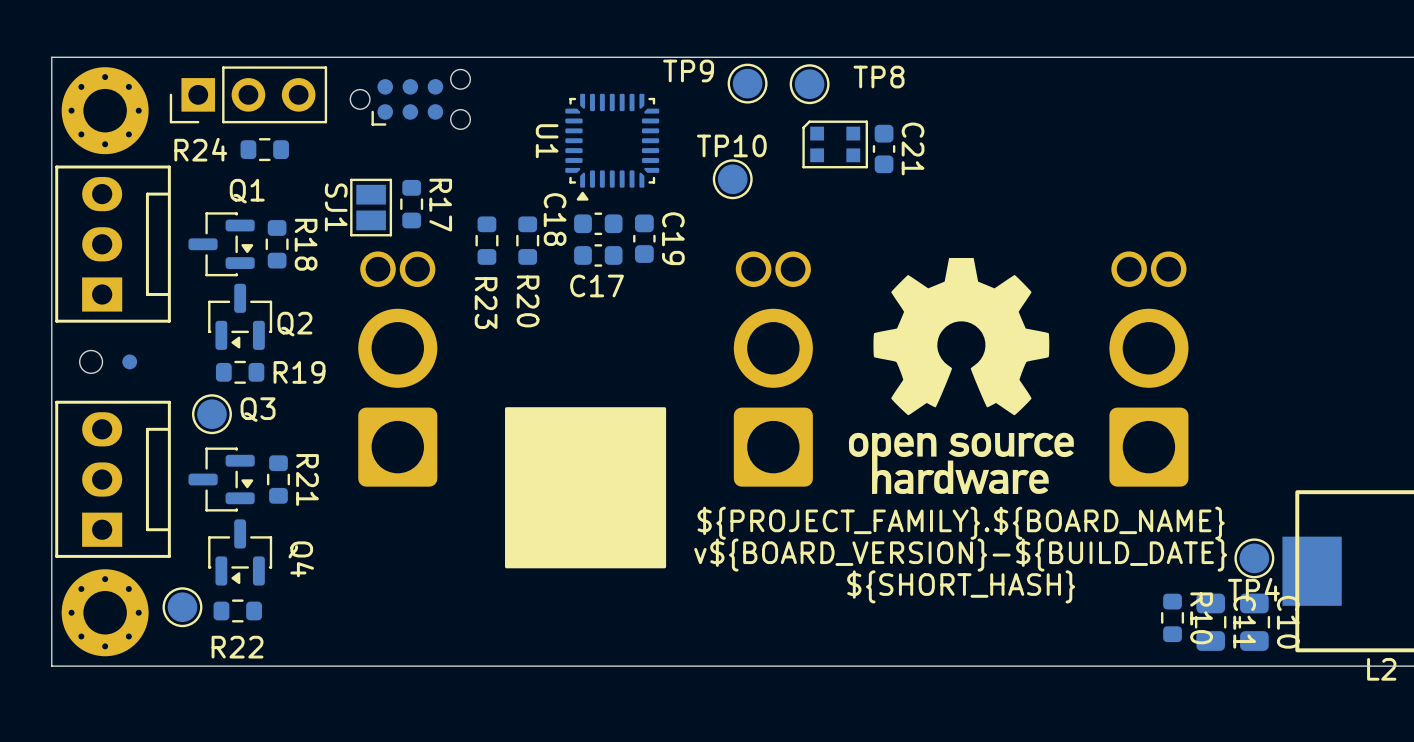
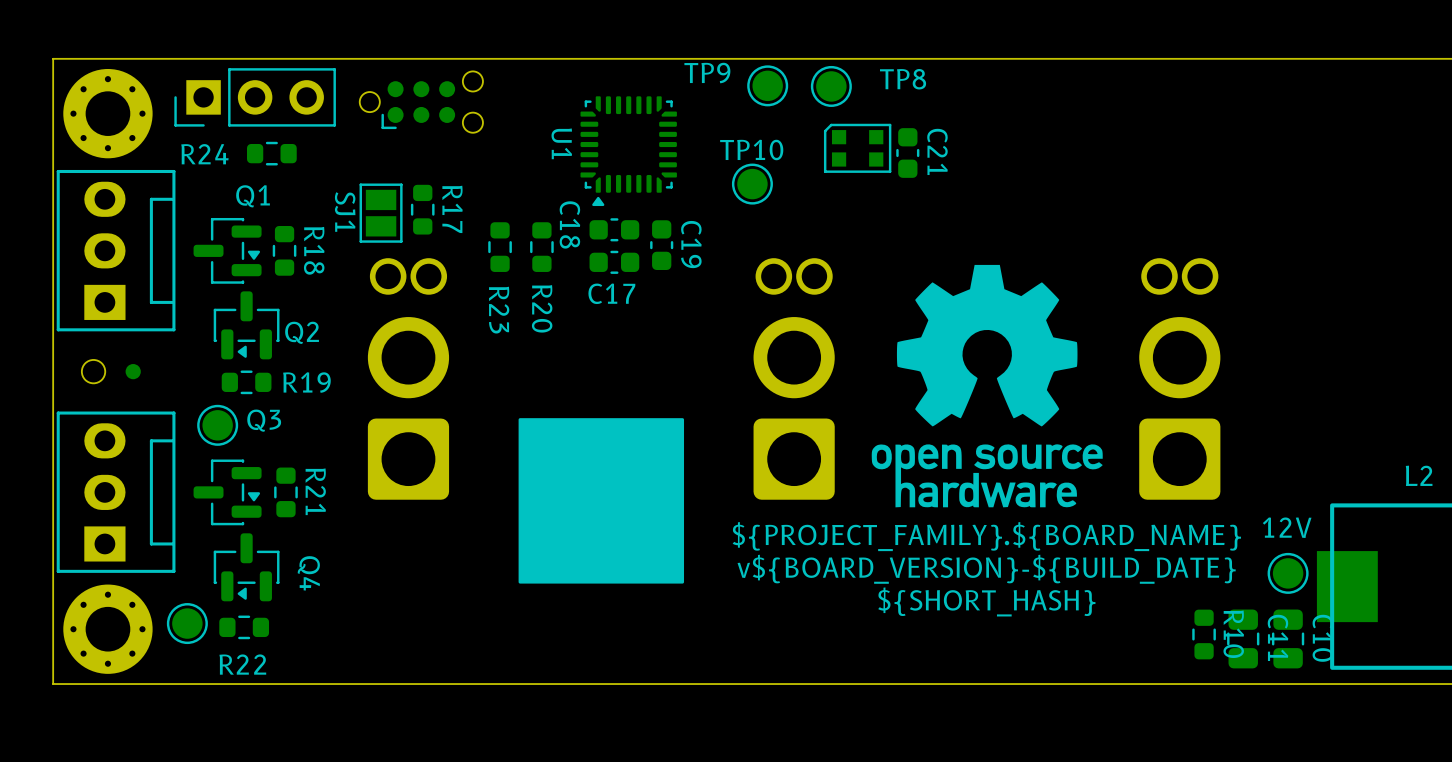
text: none -> 12V (1287, 527)
TP4 name: TP4 (1253, 589) -> none
L2 name position: L2 (1381, 669) -> L2 (1419, 475)

